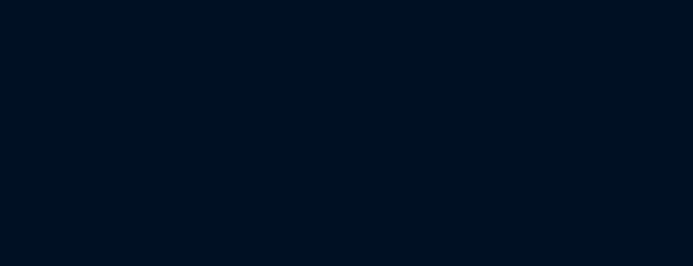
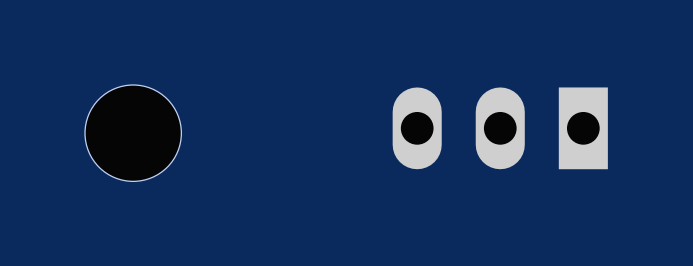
part: none -> (500, 128)
part: none -> (133, 133)

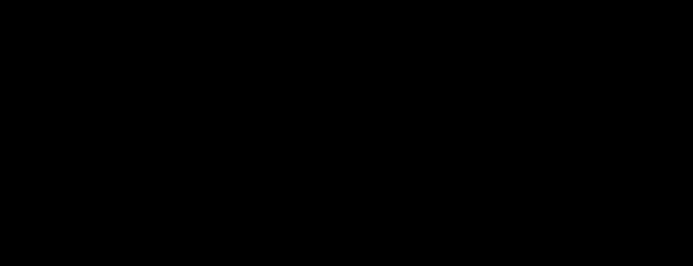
part: (500, 128) -> none
part: (133, 133) -> none

